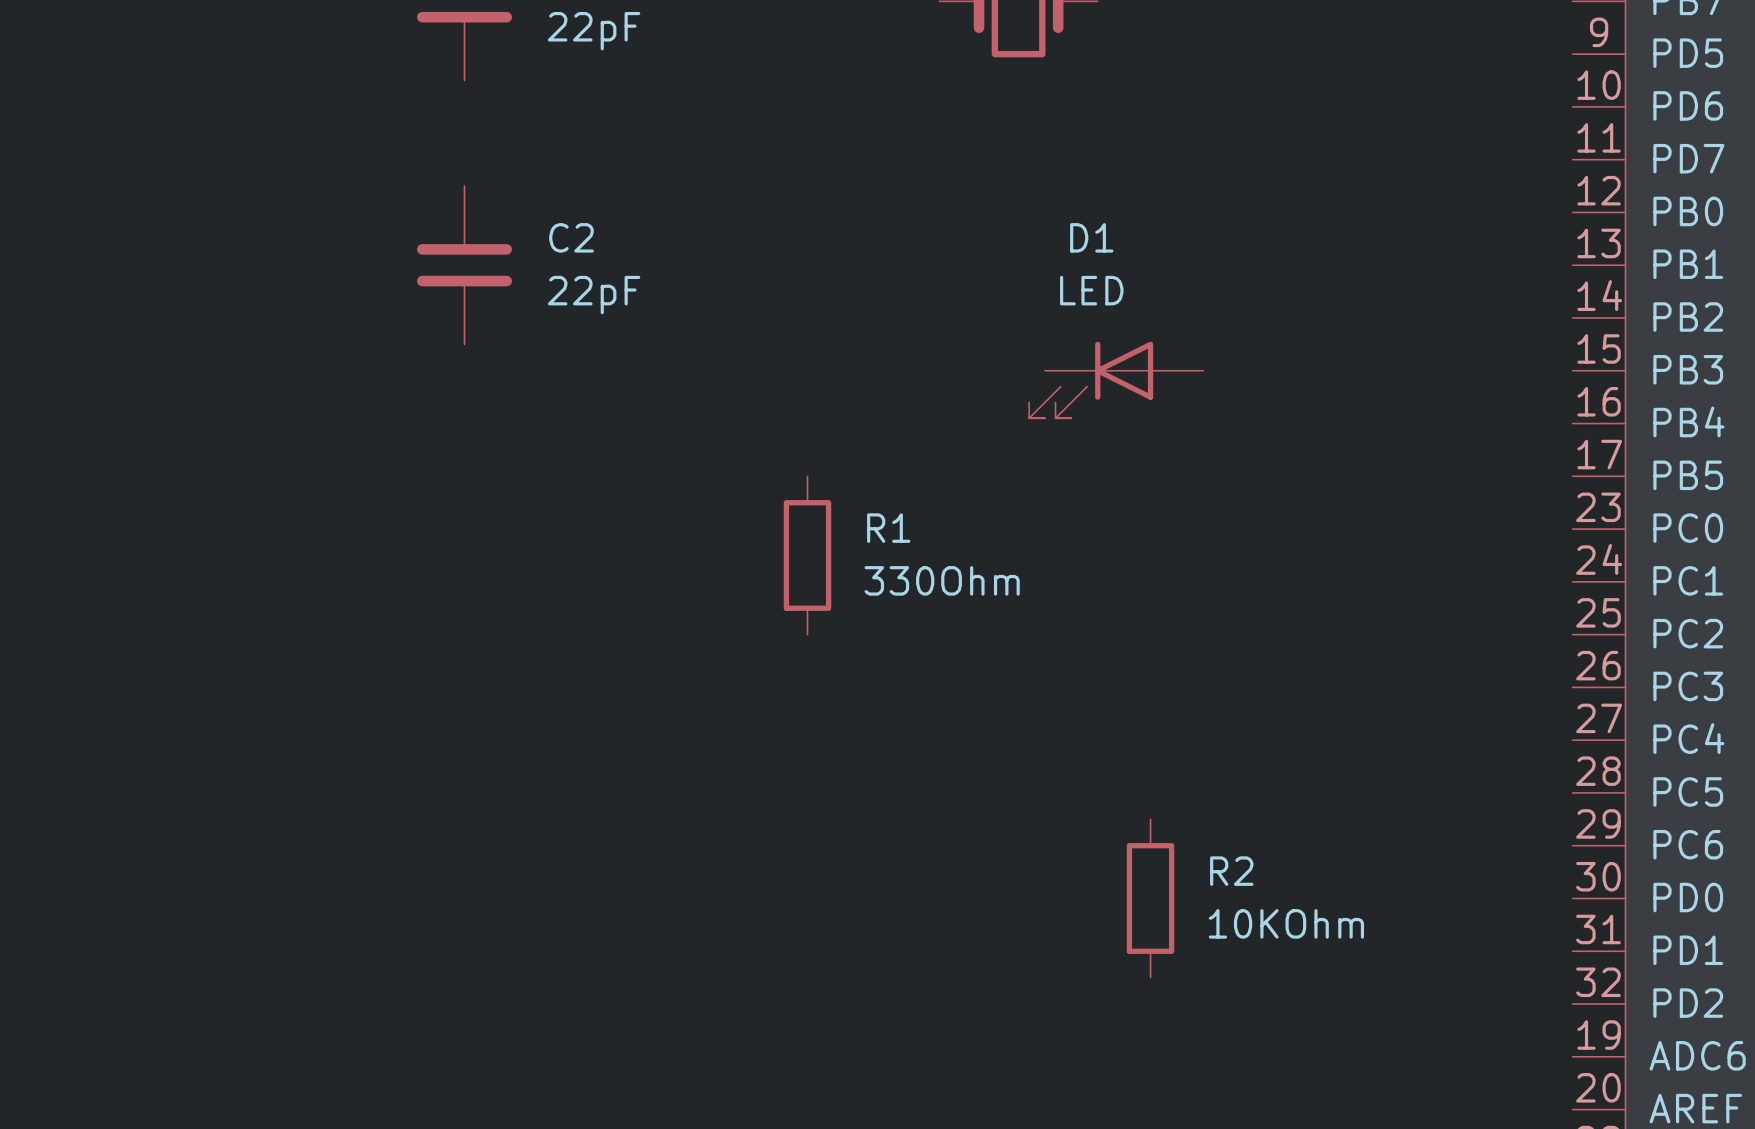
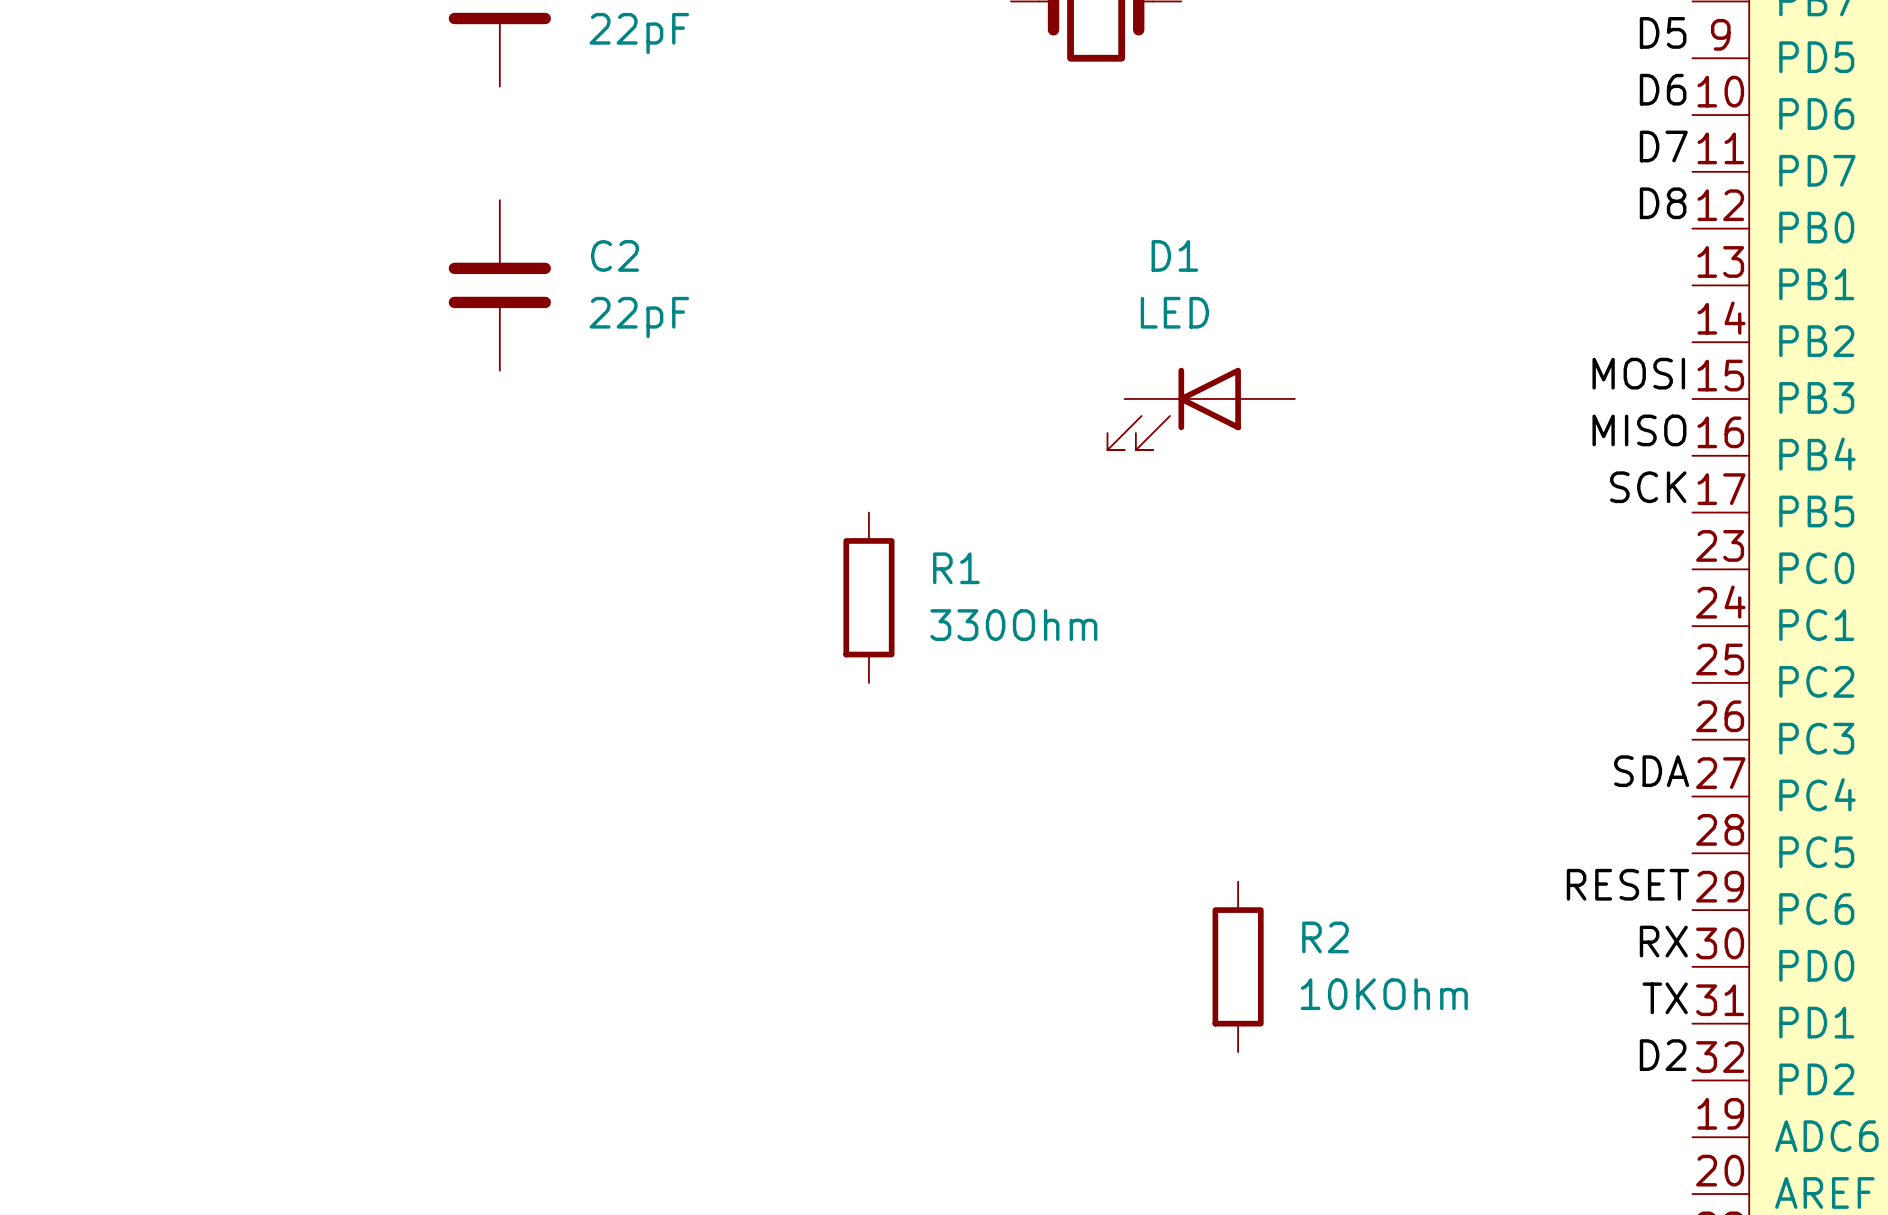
label: none -> D5 (1663, 32)
label: none -> D6 (1663, 89)
label: none -> D7 (1663, 146)
label: none -> D8 (1663, 203)
label: none -> MOSI (1638, 373)
label: none -> MISO (1639, 430)
label: none -> SCK (1648, 487)
label: none -> SDA (1651, 771)
label: none -> RESET (1627, 884)
label: none -> RX (1663, 941)
label: none -> TX (1665, 998)
label: none -> D2 (1663, 1055)

